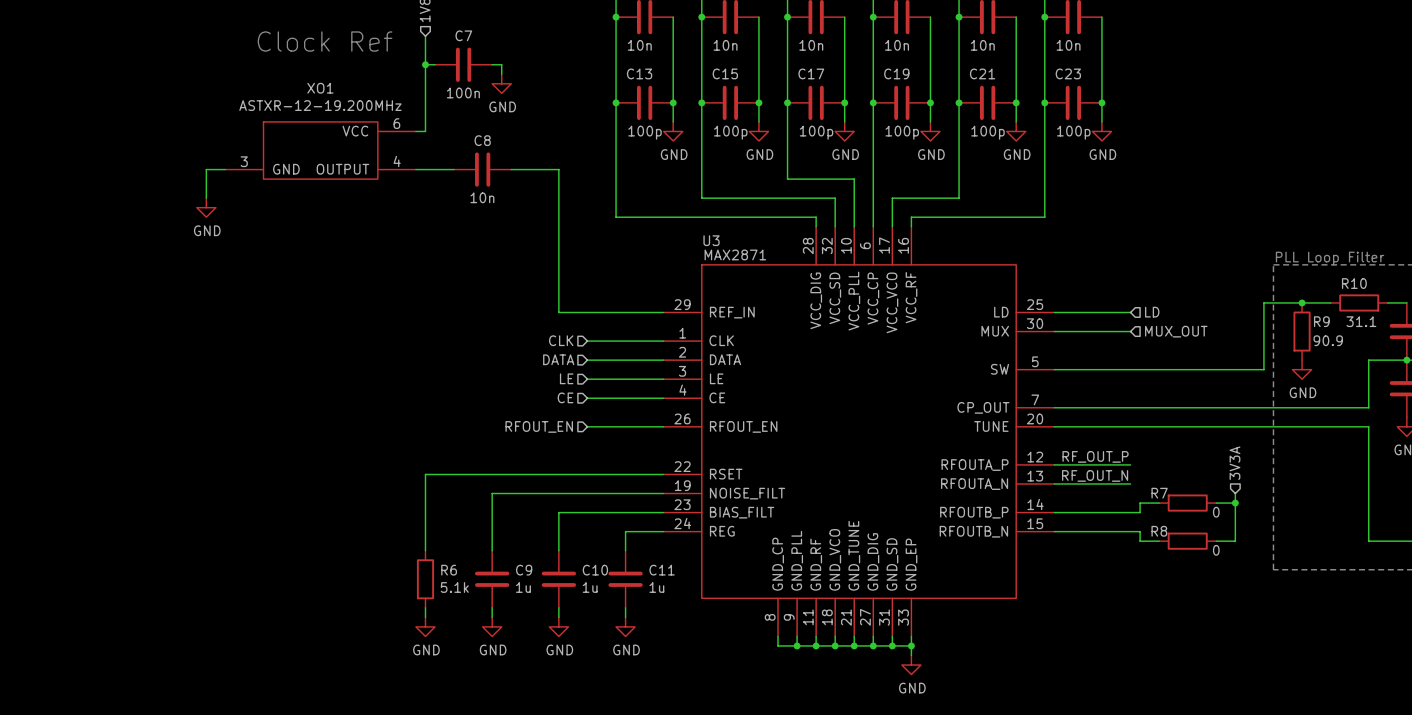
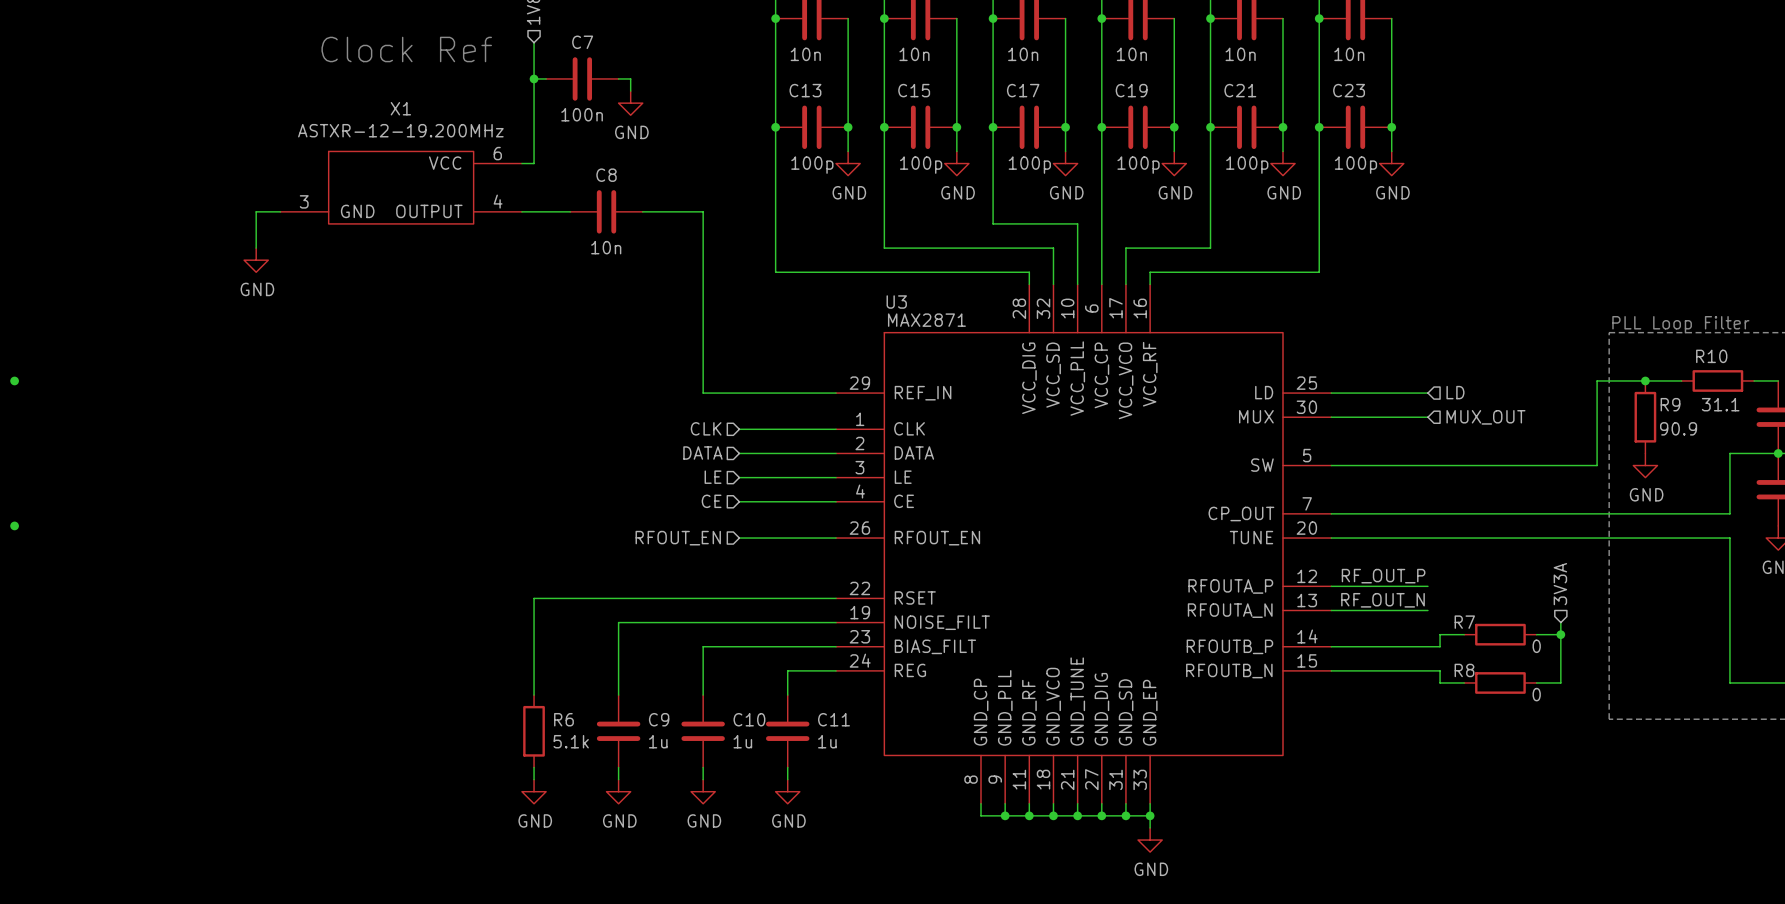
XO1 name: XO1 (320, 88) -> X1 (400, 108)
junction: none -> (14, 380)
junction: none -> (14, 525)

